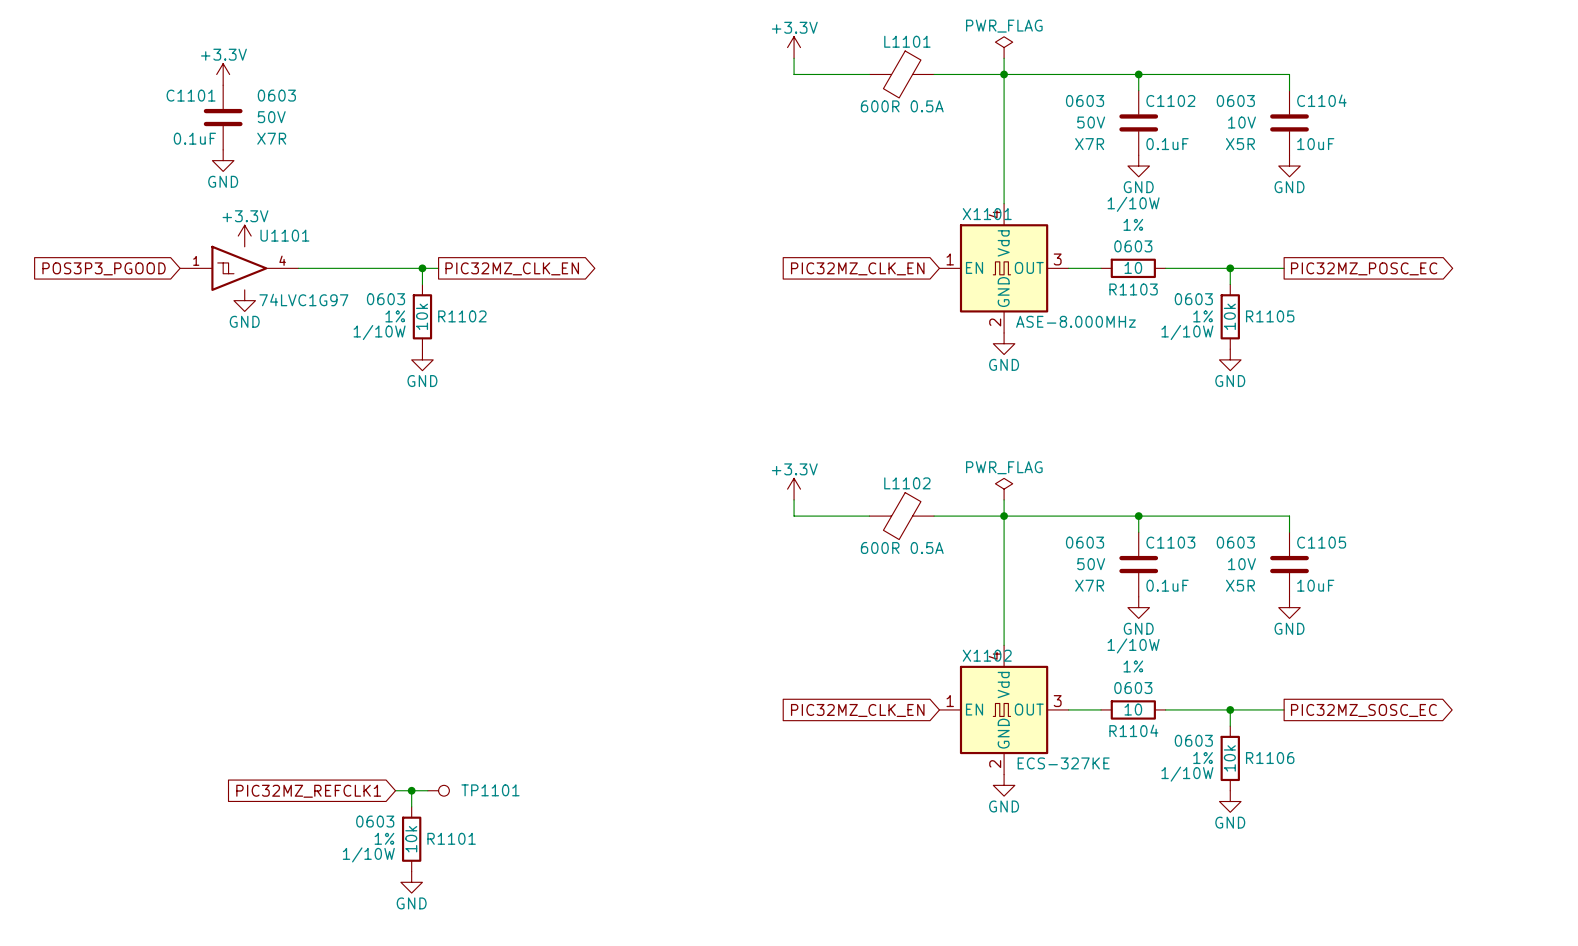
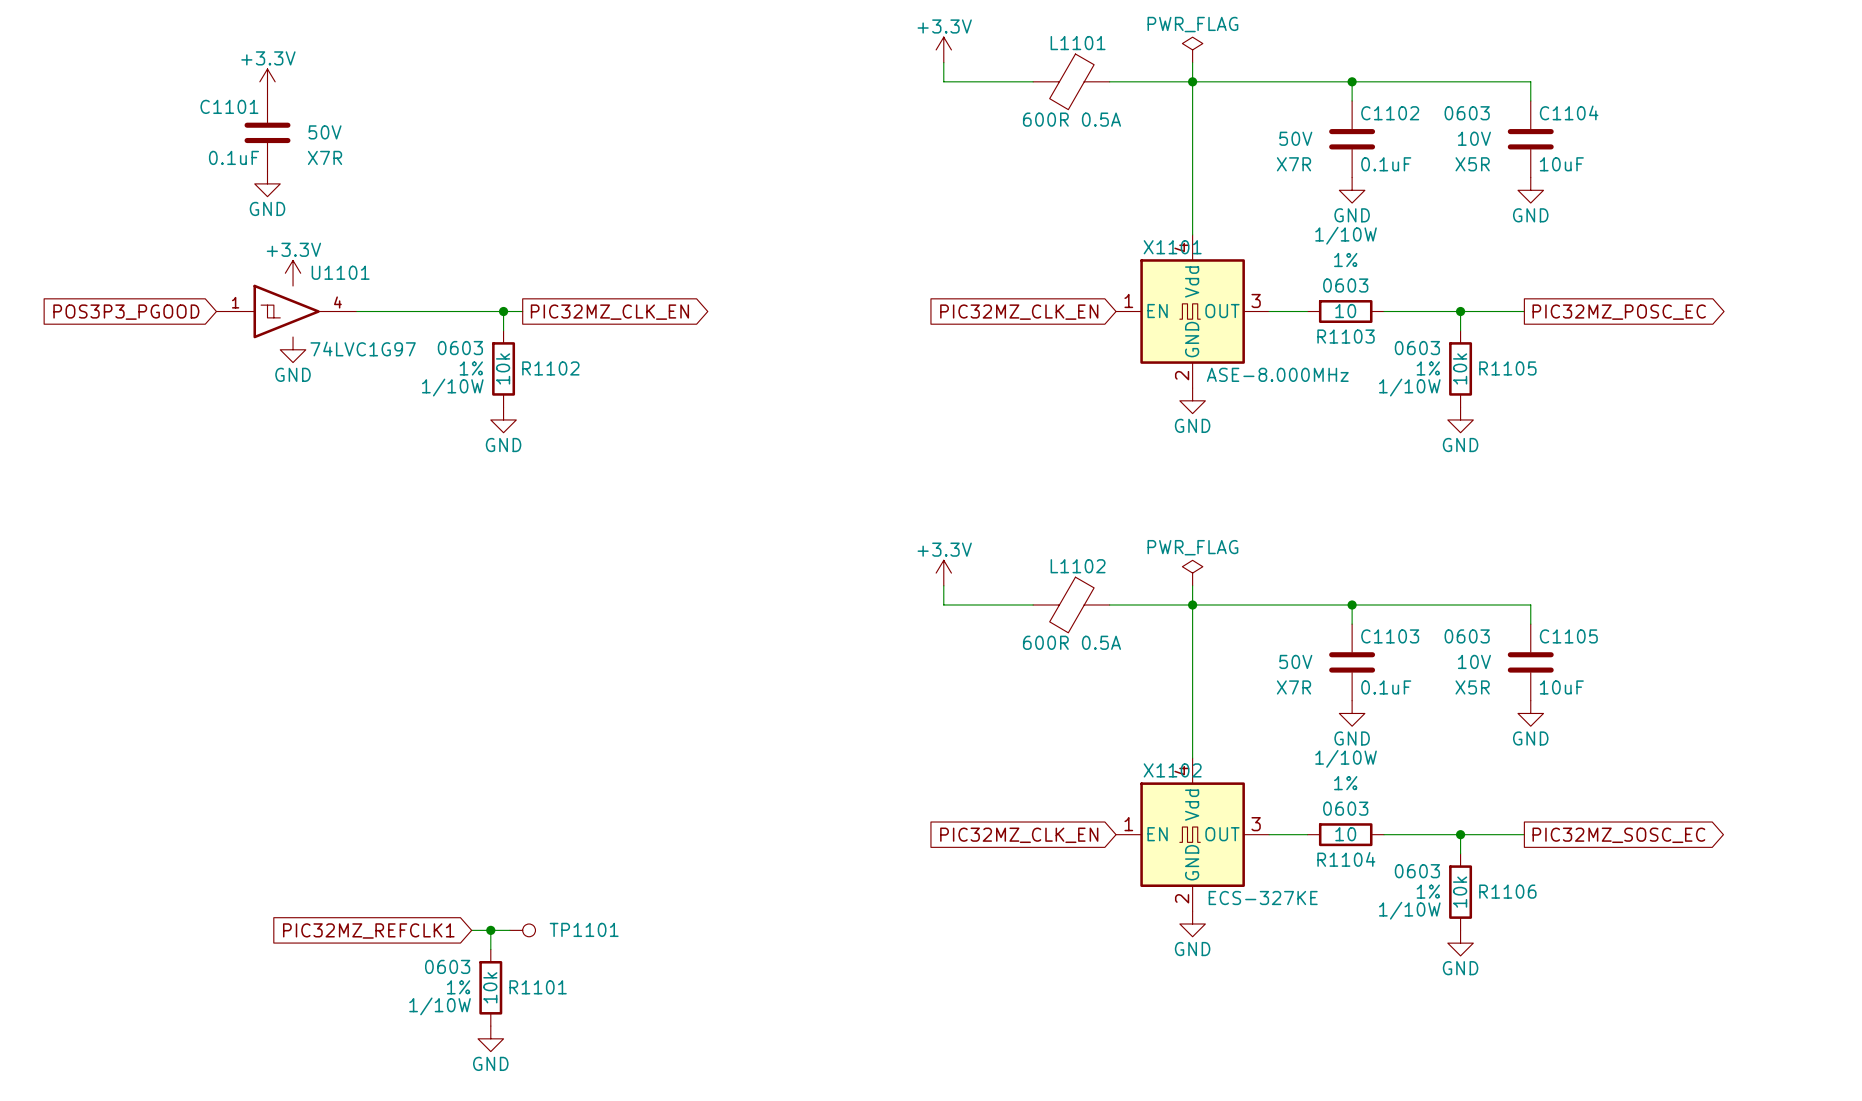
C1101 text: 0603 (276, 95) -> none
C1102 text: 0603 (1085, 100) -> none
C1103 text: 0603 (1085, 542) -> none

